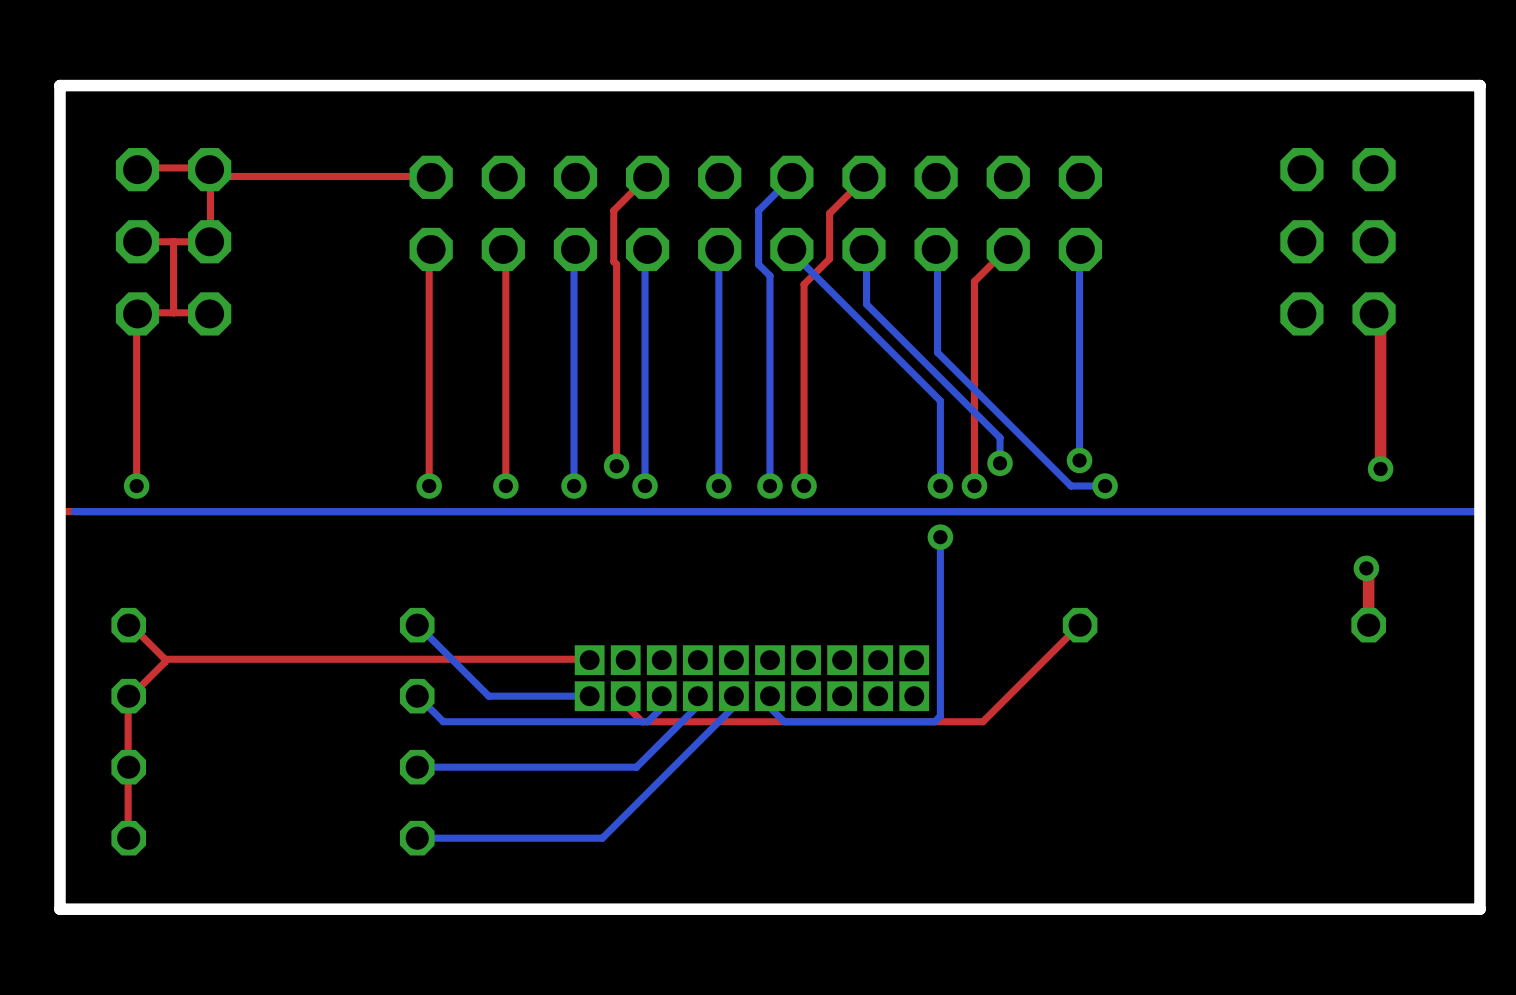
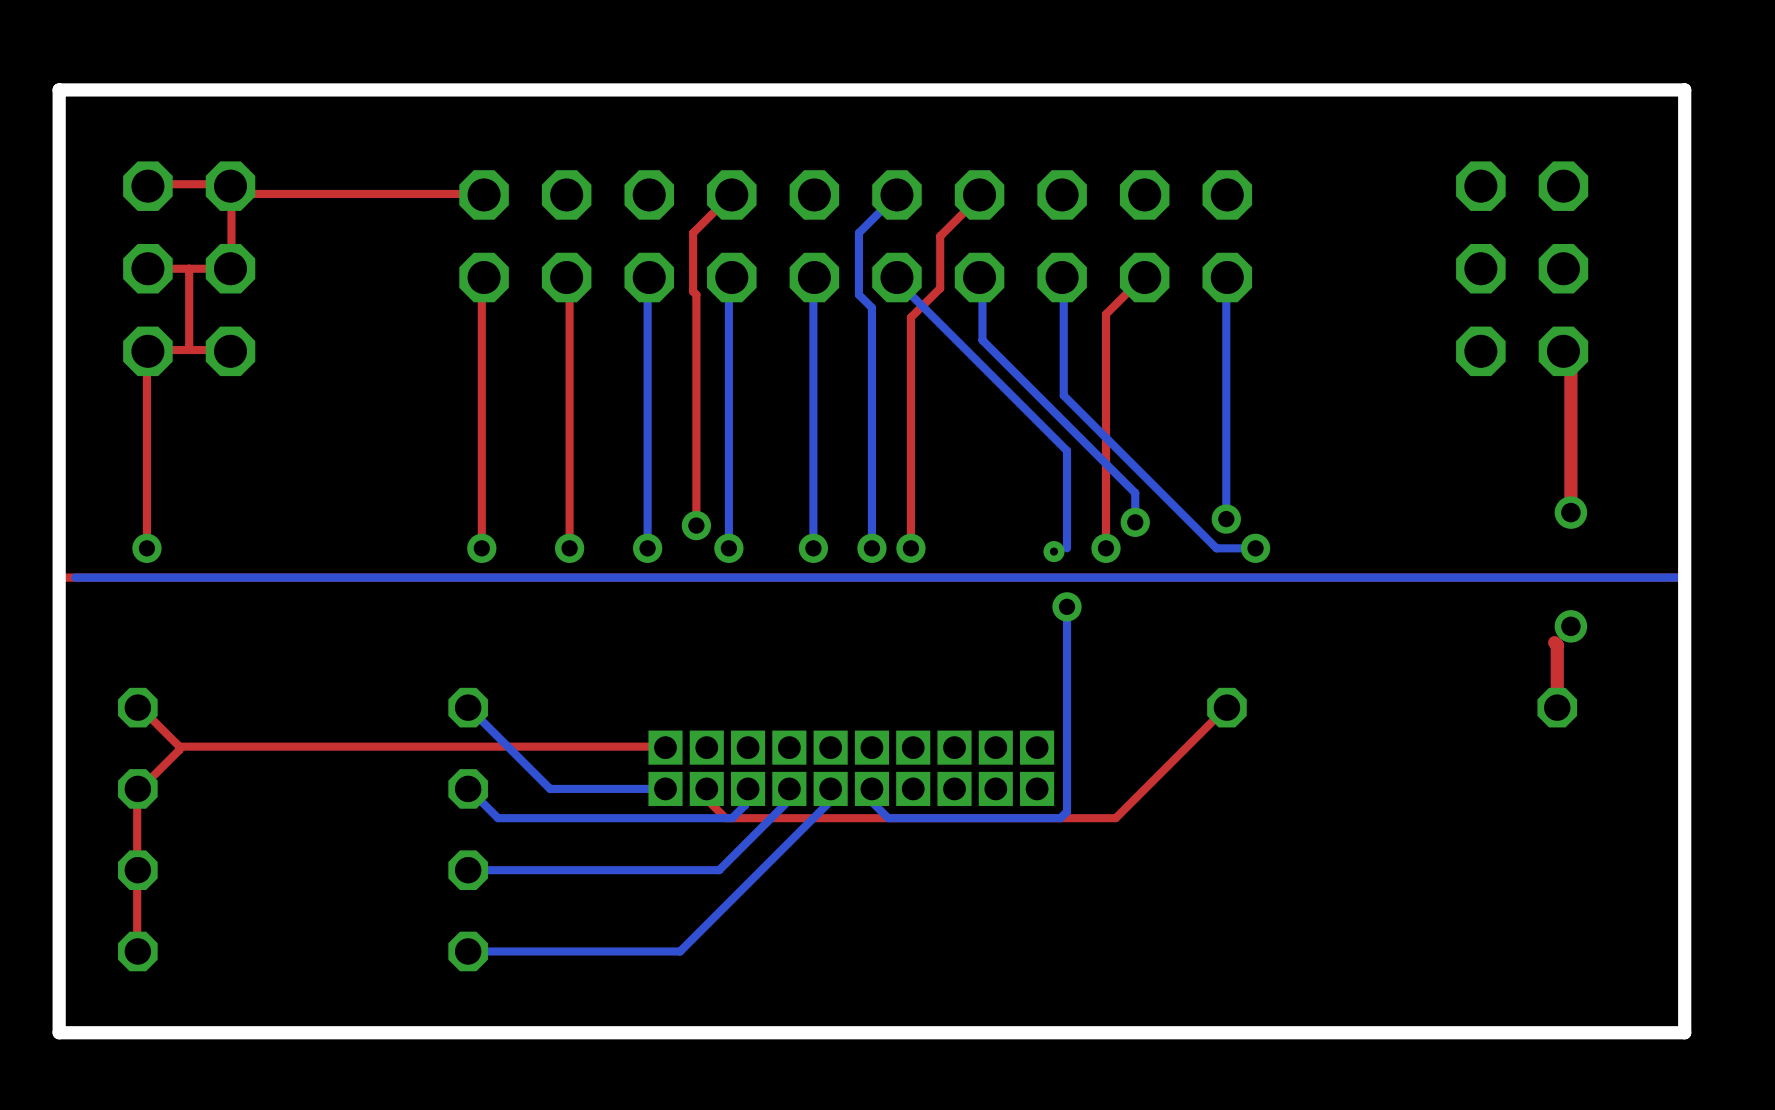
via position: (1380, 468) -> (1570, 512)
via size: [927, 473, 954, 499] -> [1043, 541, 1065, 563]
via position: (1366, 568) -> (1570, 626)

